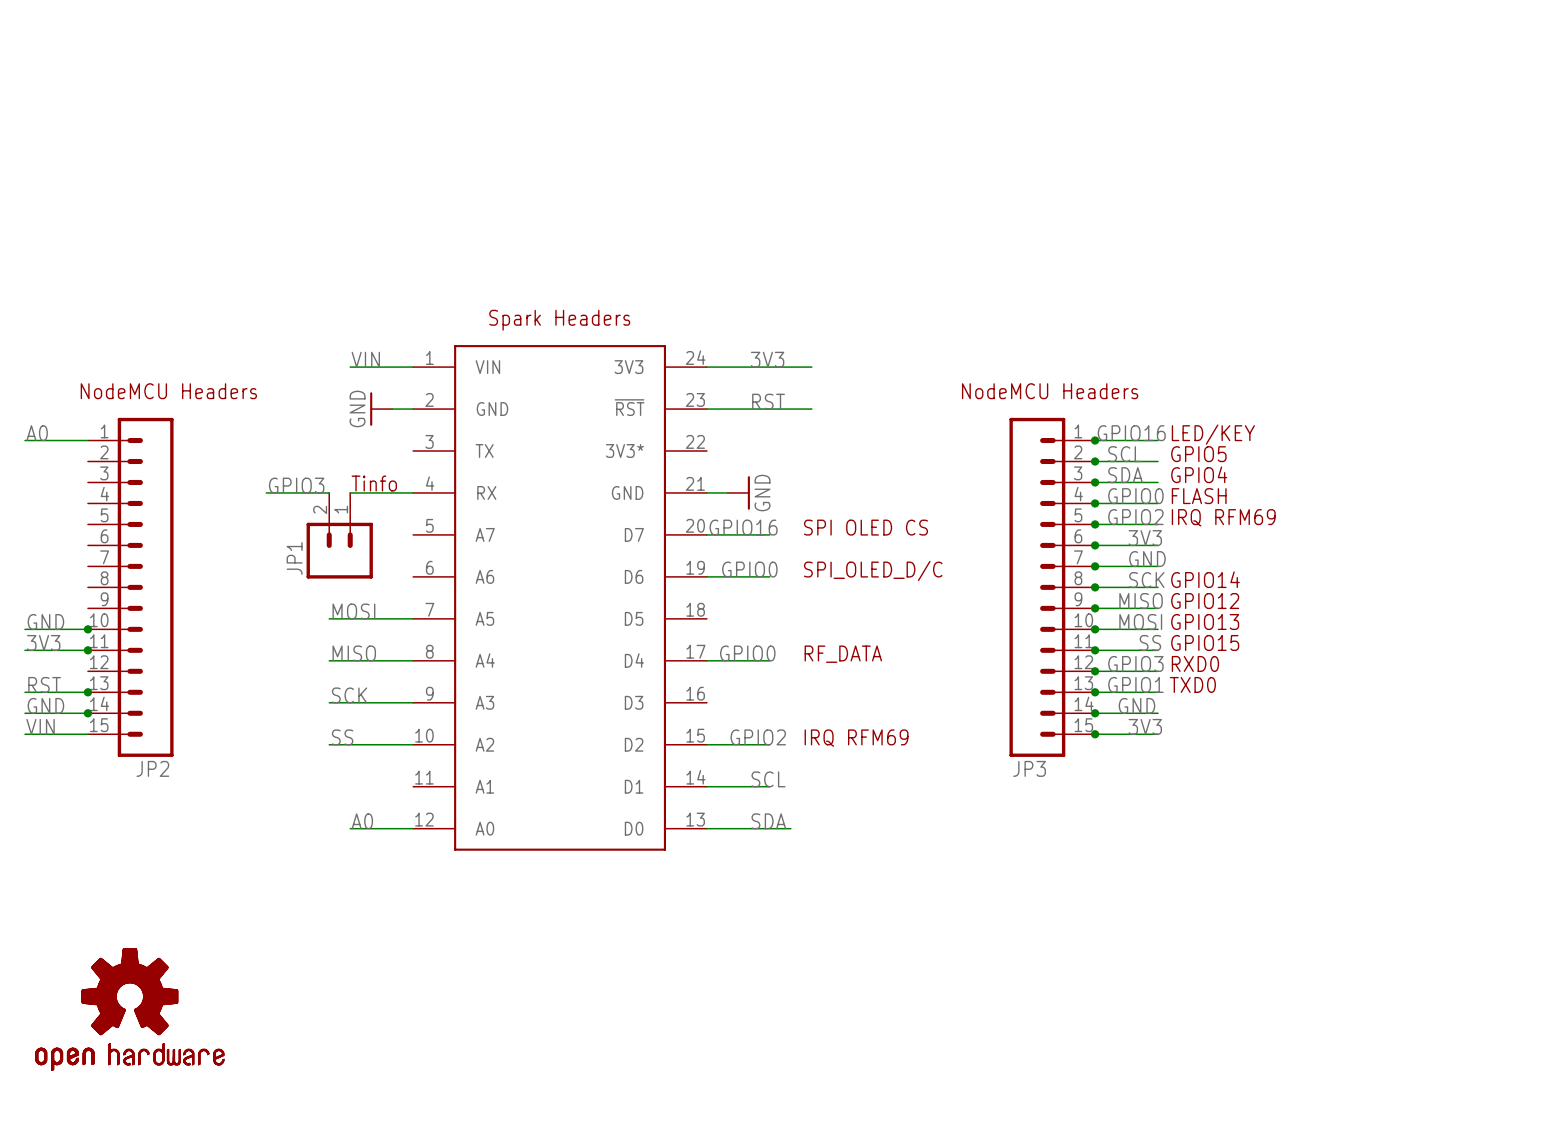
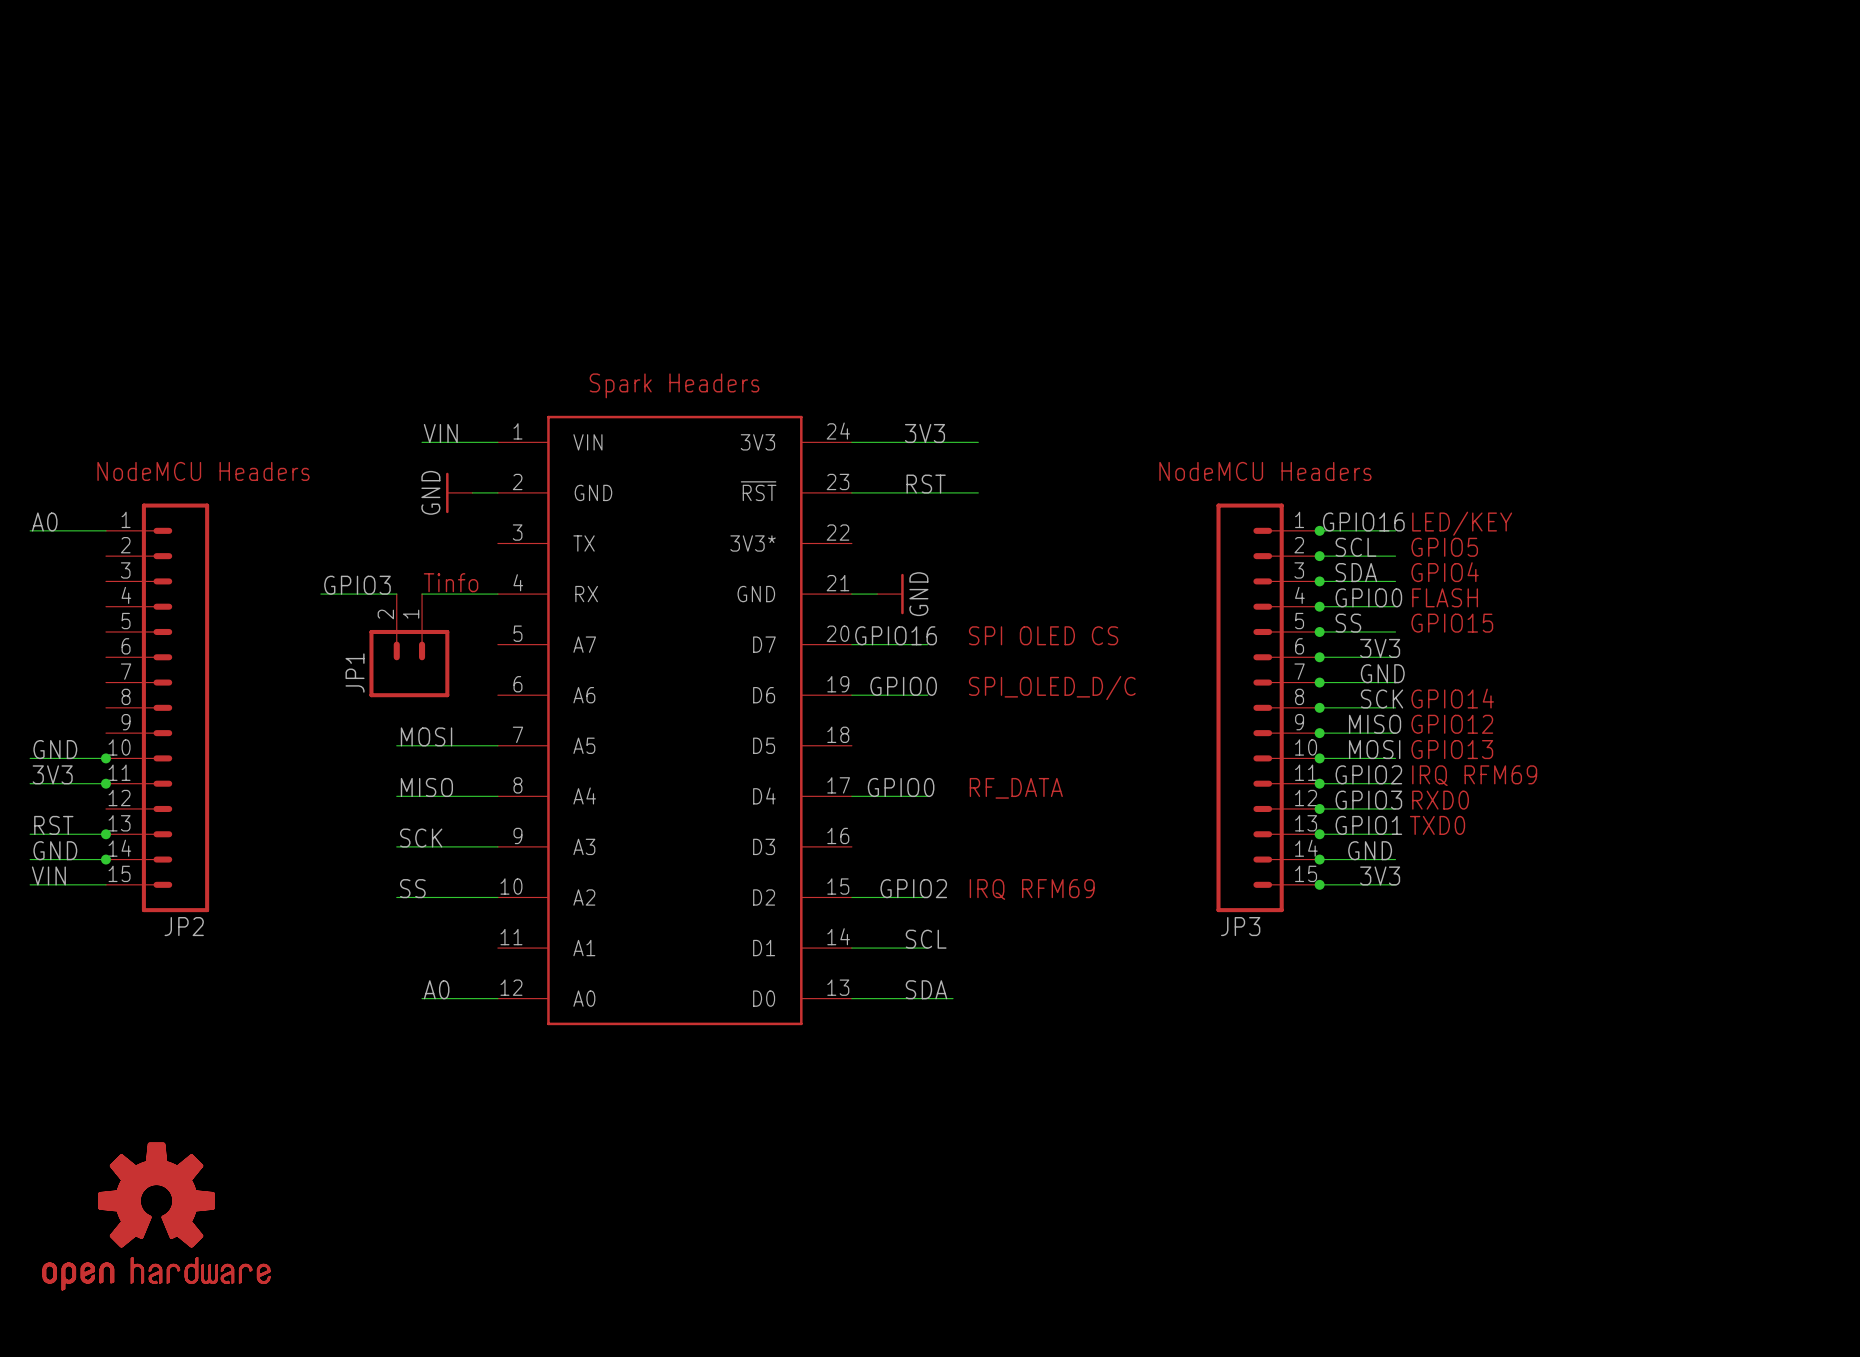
label: GPIO2 (1135, 517) -> SS (1348, 623)
text: IRQ RFM69 (1223, 517) -> GPIO15 (1452, 623)
label: none -> GPIO2 (1368, 774)
label: SS (1150, 642) -> none
text: GPIO15 (1205, 642) -> IRQ RFM69 (1474, 775)

